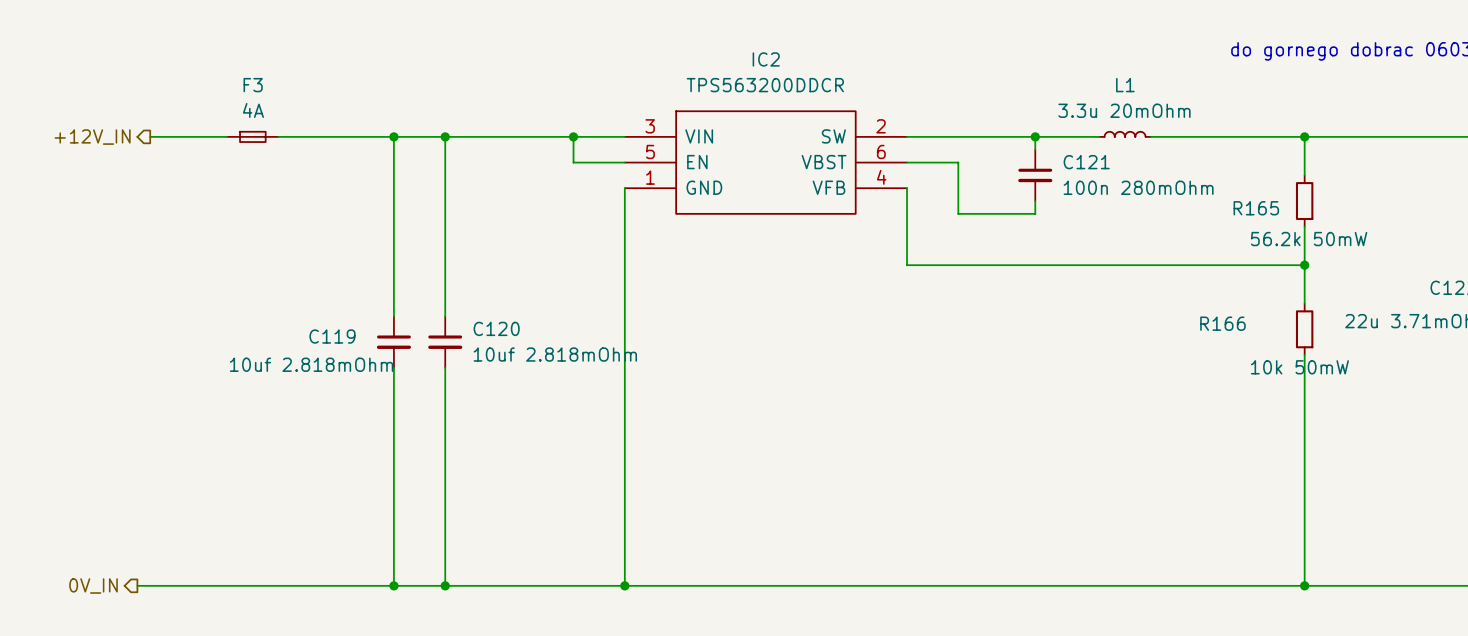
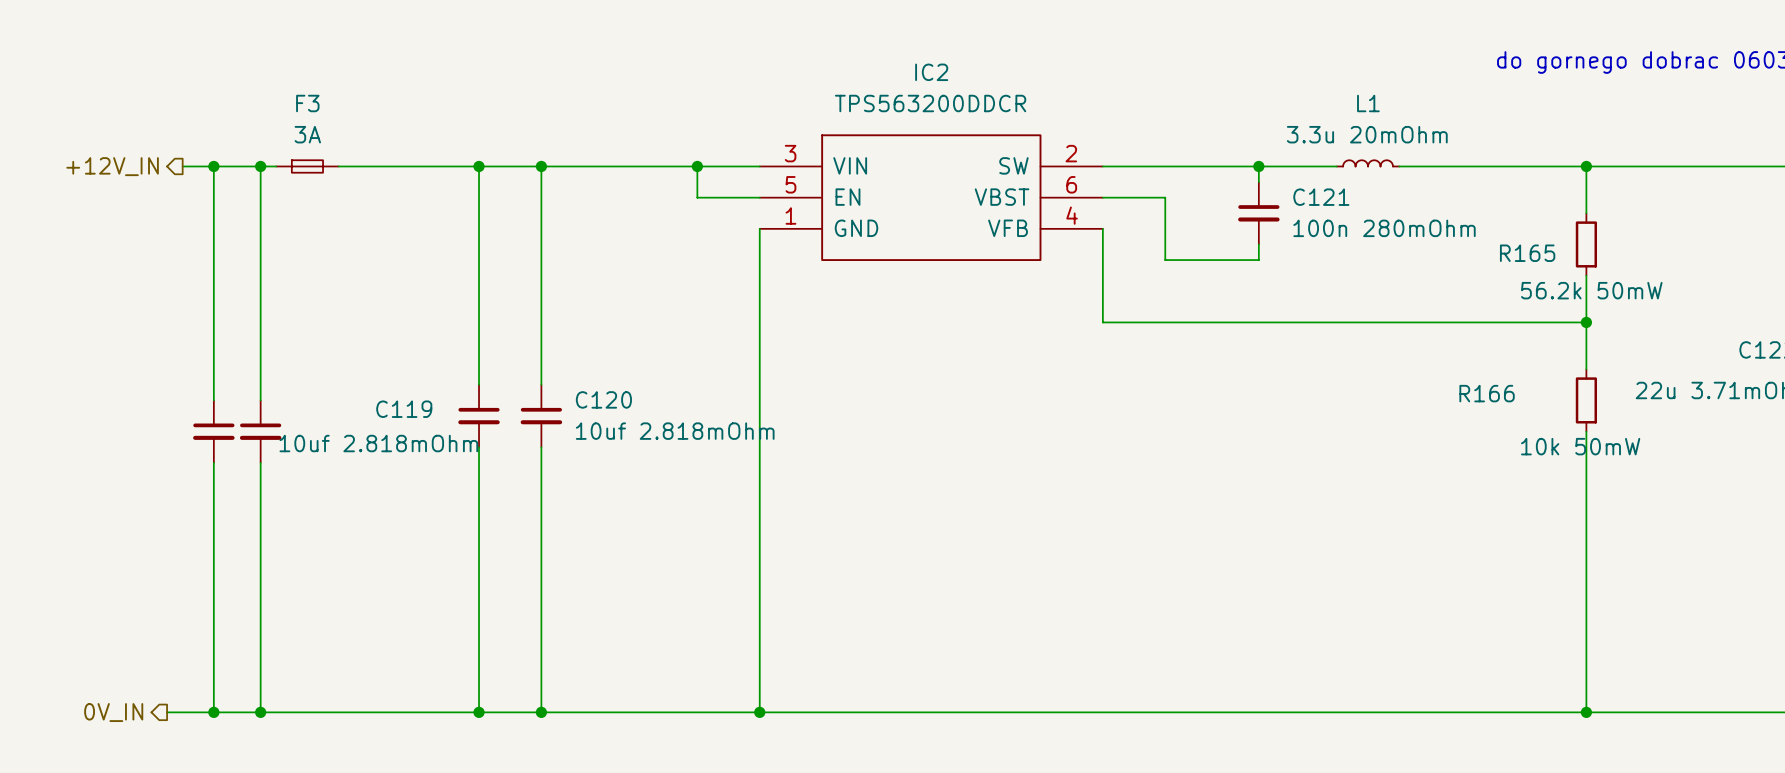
F3 value: 4A (253, 110) -> 3A (307, 134)
wire: none -> (213, 166) (213, 400)
junction: none -> (213, 166)
wire: none -> (260, 166) (260, 400)
junction: none -> (260, 166)
part: none -> (213, 431)
part: none -> (260, 431)
wire: none -> (213, 462) (213, 712)
wire: none -> (260, 462) (260, 712)
junction: none -> (213, 712)
junction: none -> (260, 712)

